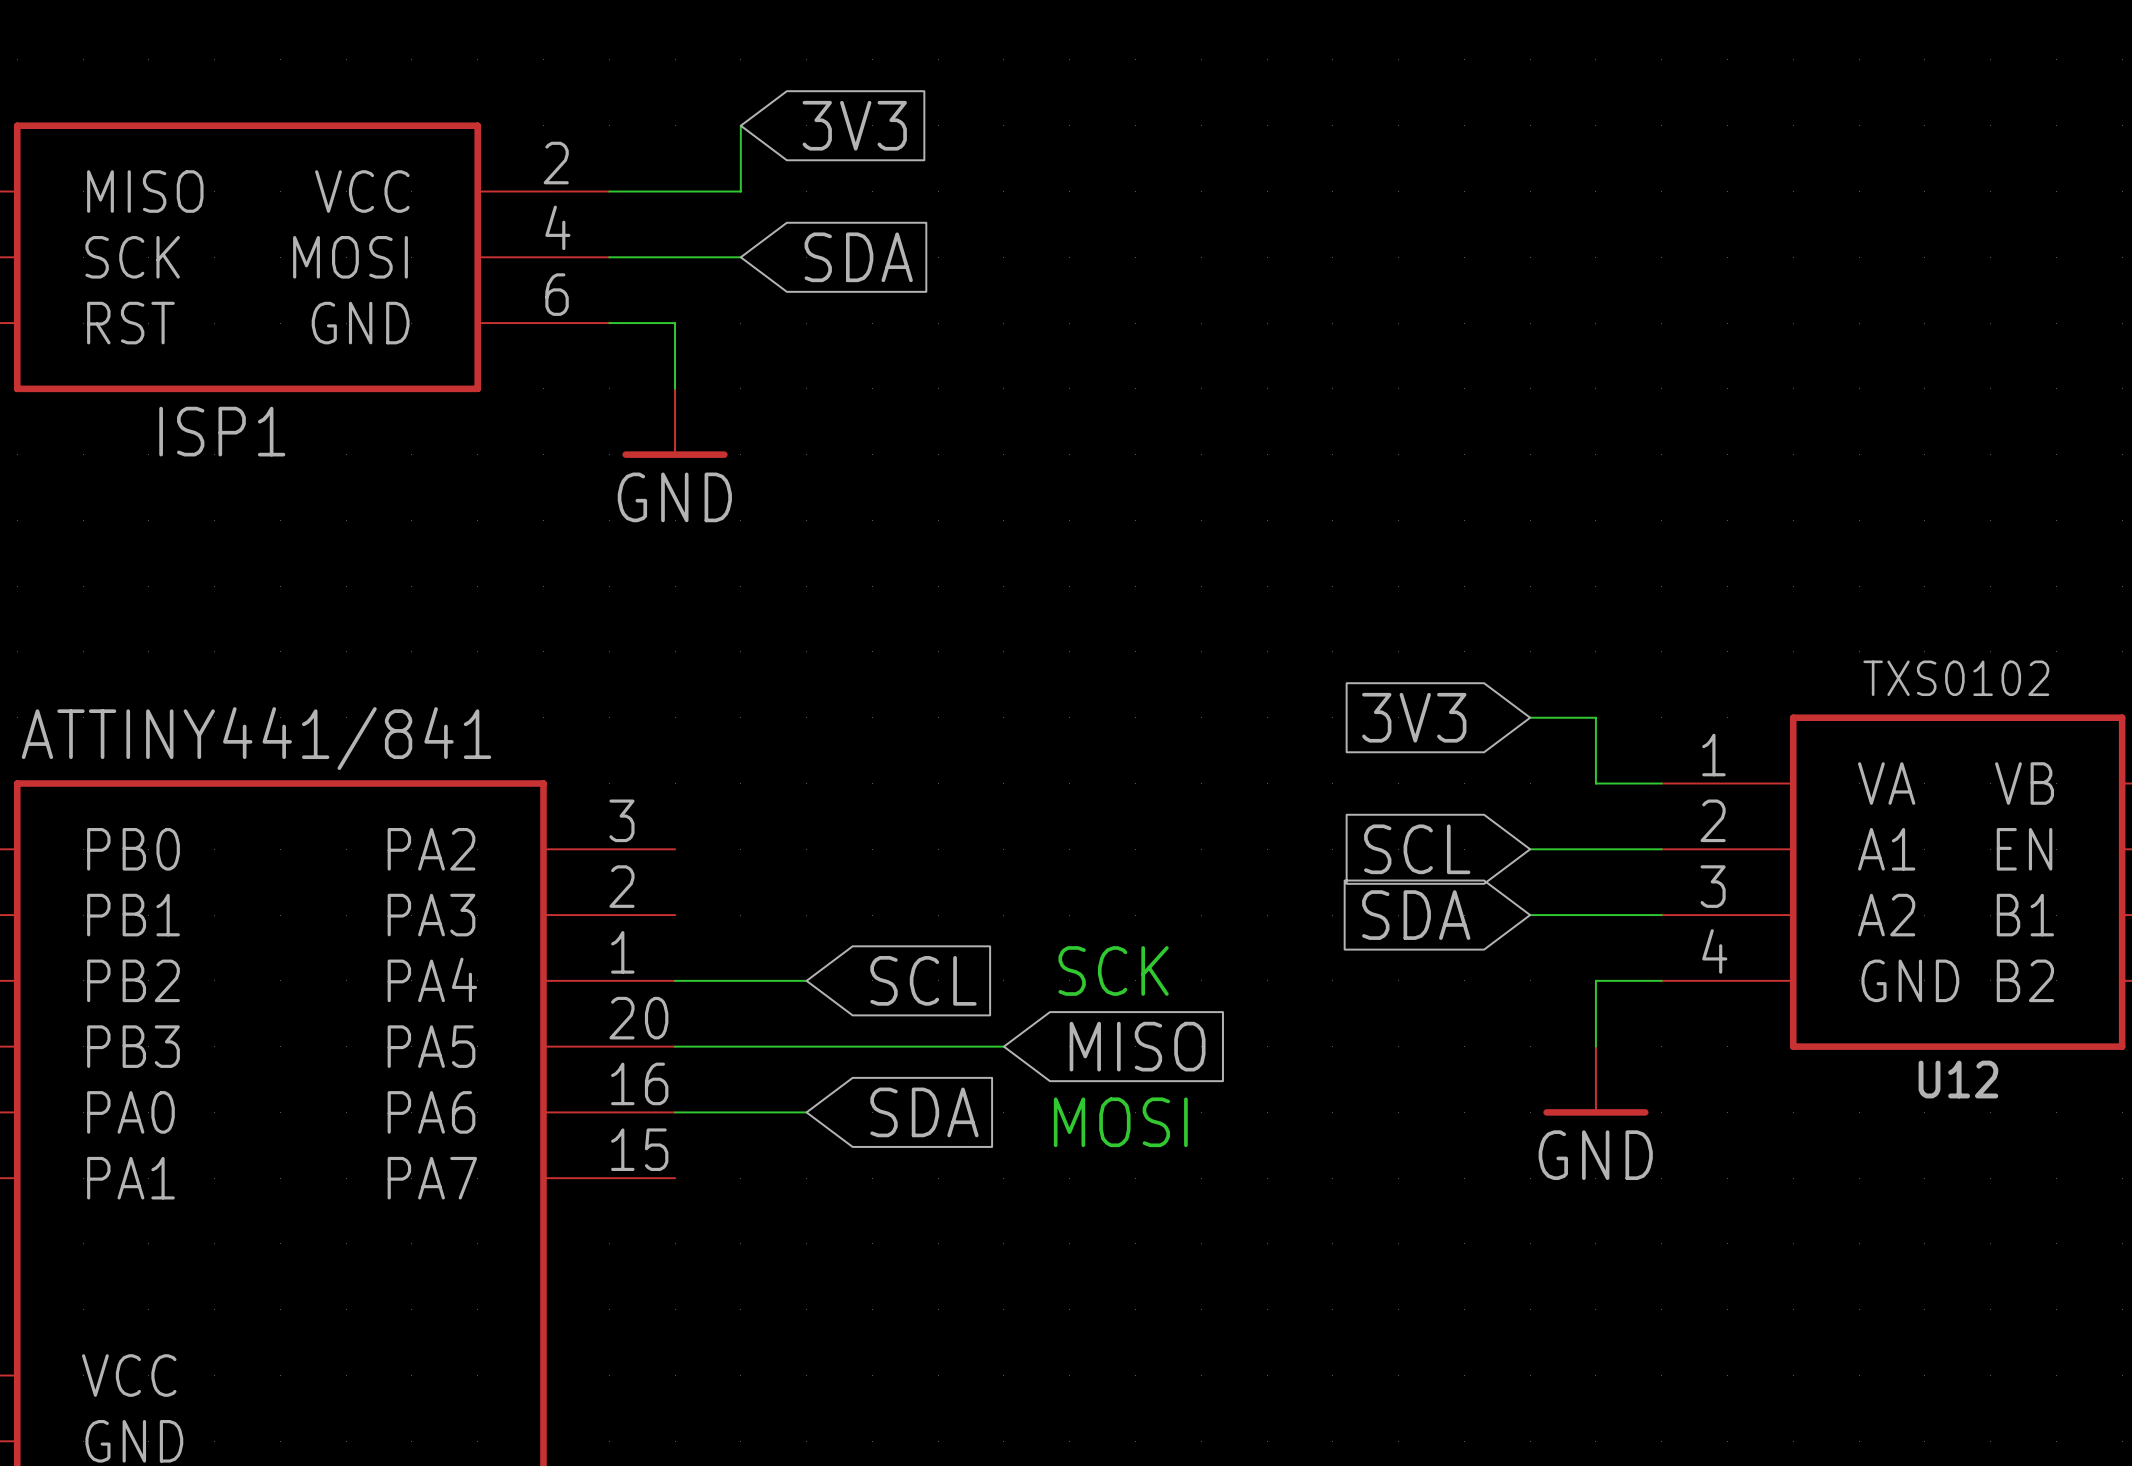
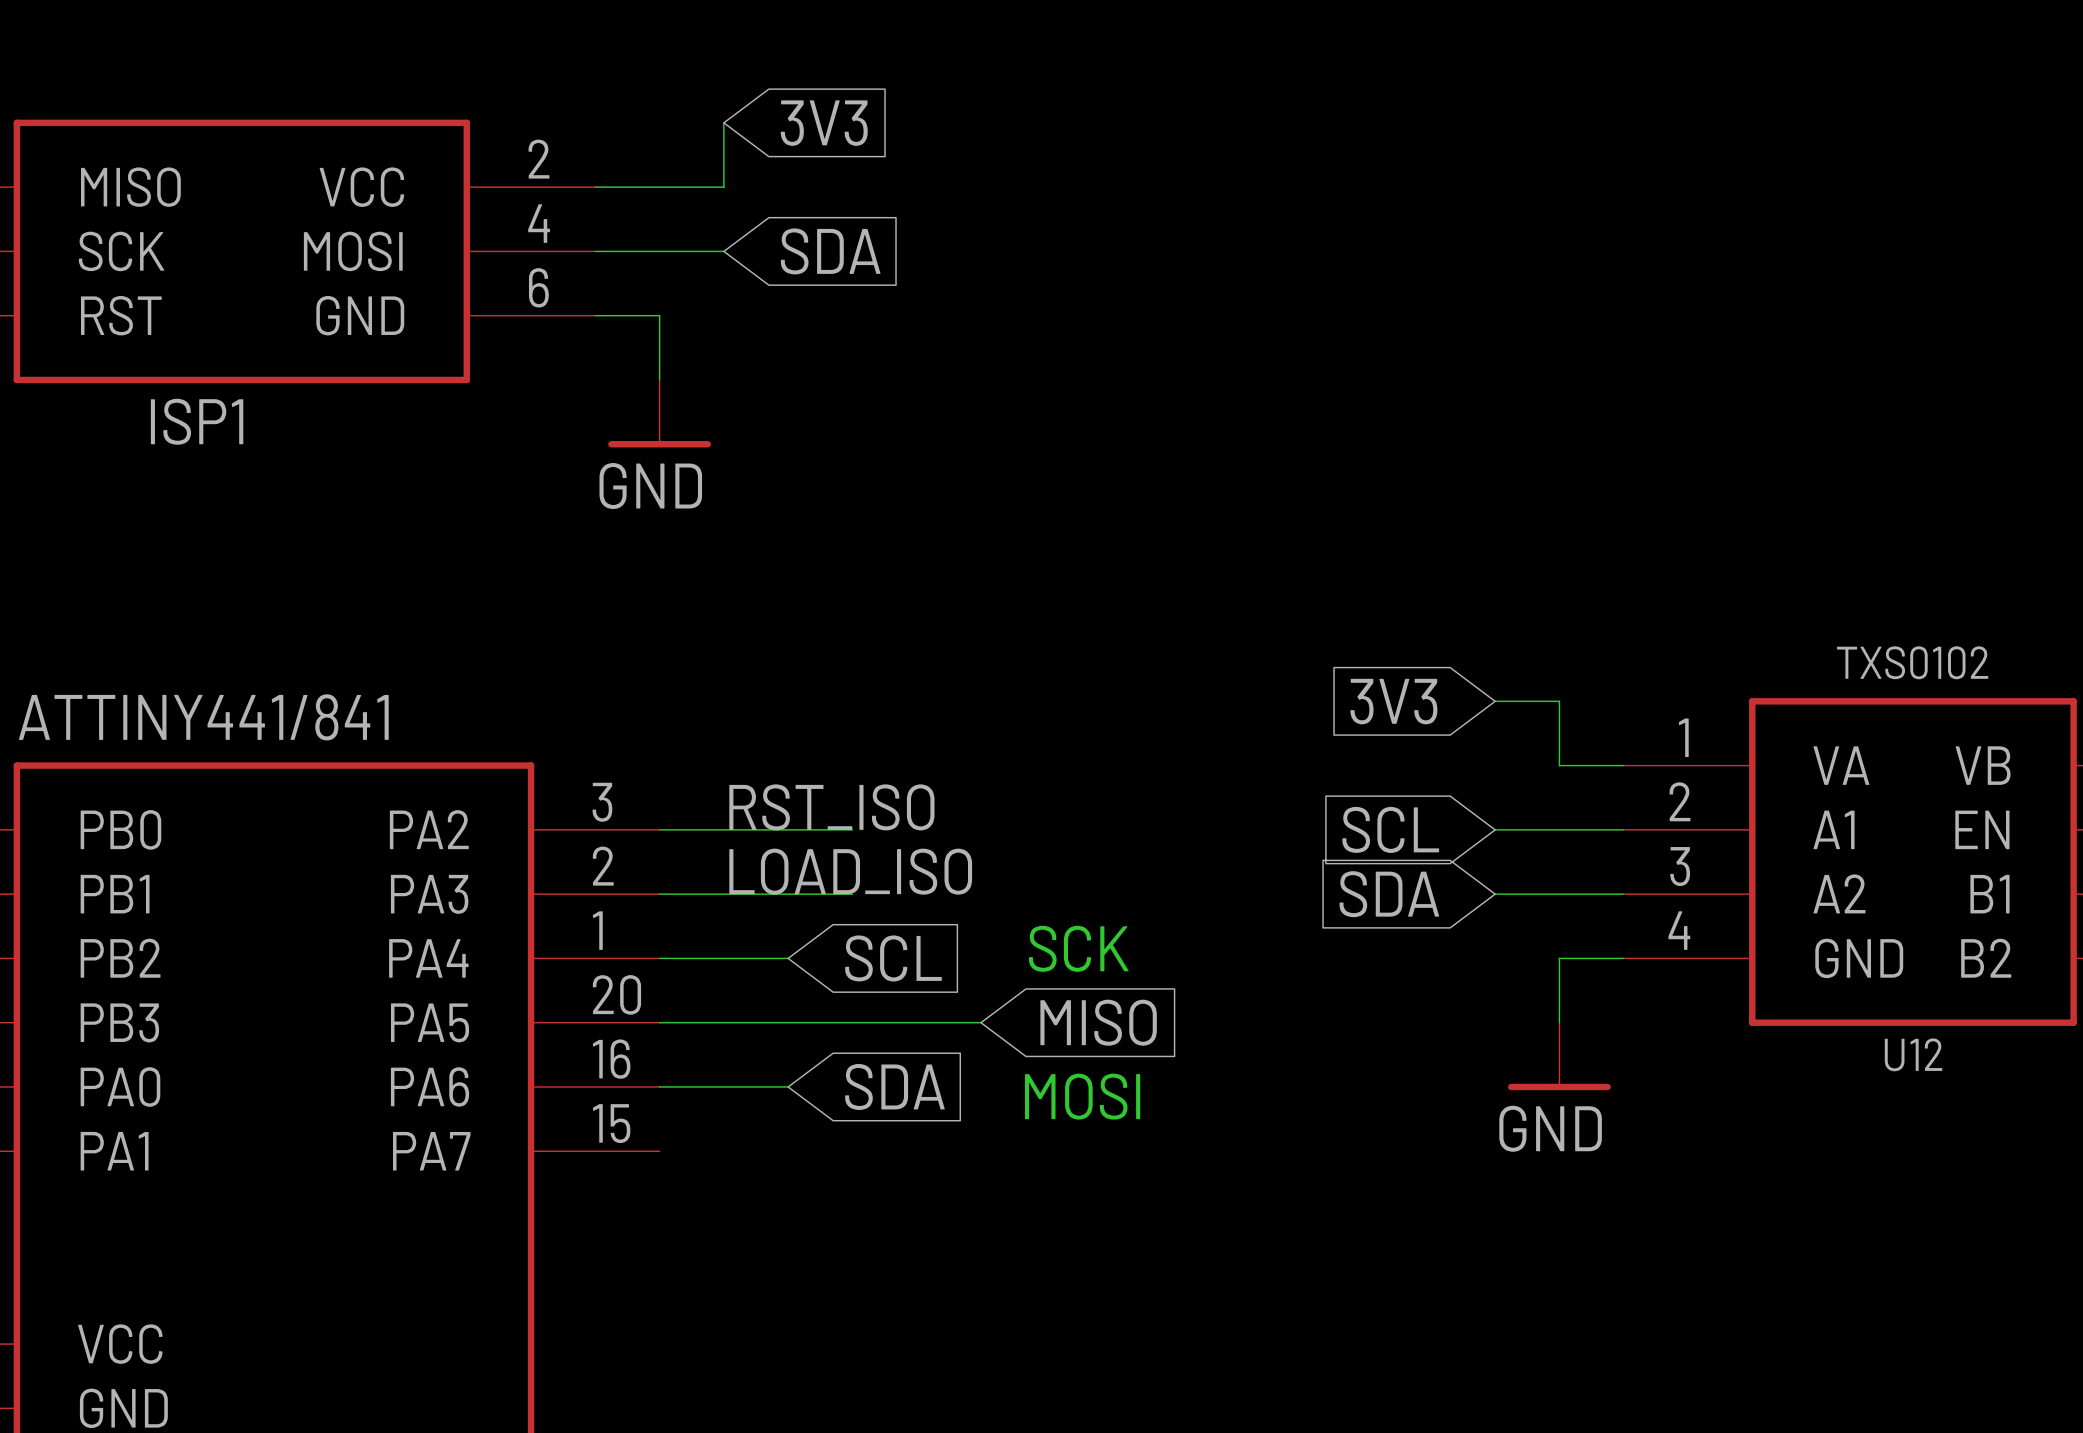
label: none -> RST_ISO (831, 807)
wire: none -> (659, 829) (852, 829)
label: none -> LOAD_ISO (850, 871)
wire: none -> (659, 894) (852, 894)

